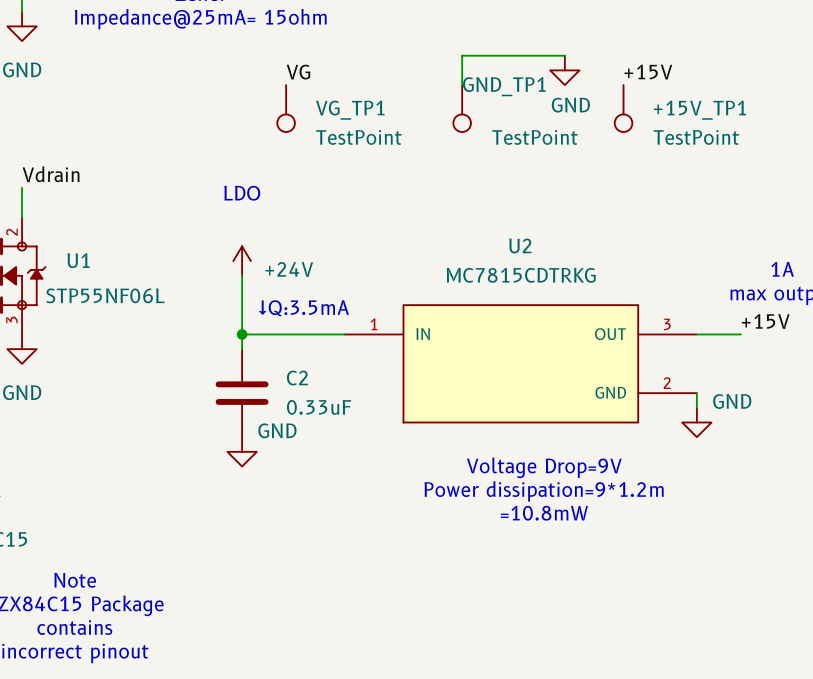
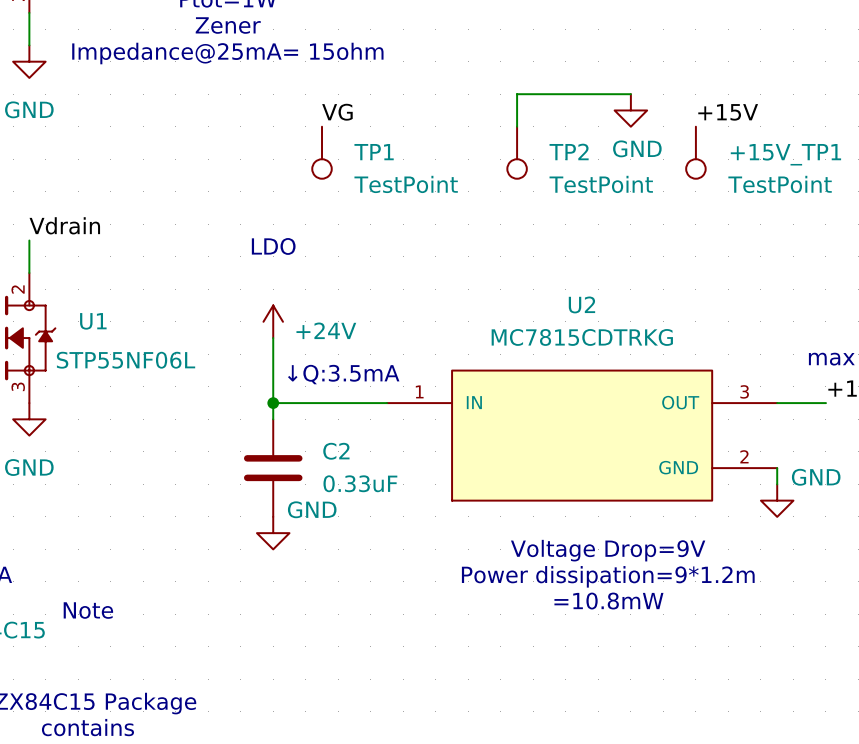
GND_TP1 name: GND_TP1 (504, 86) -> TP2 (569, 151)
VG_TP1 name: VG_TP1 (350, 110) -> TP1 (374, 152)
text position: Note (75, 580) -> Note (88, 610)

